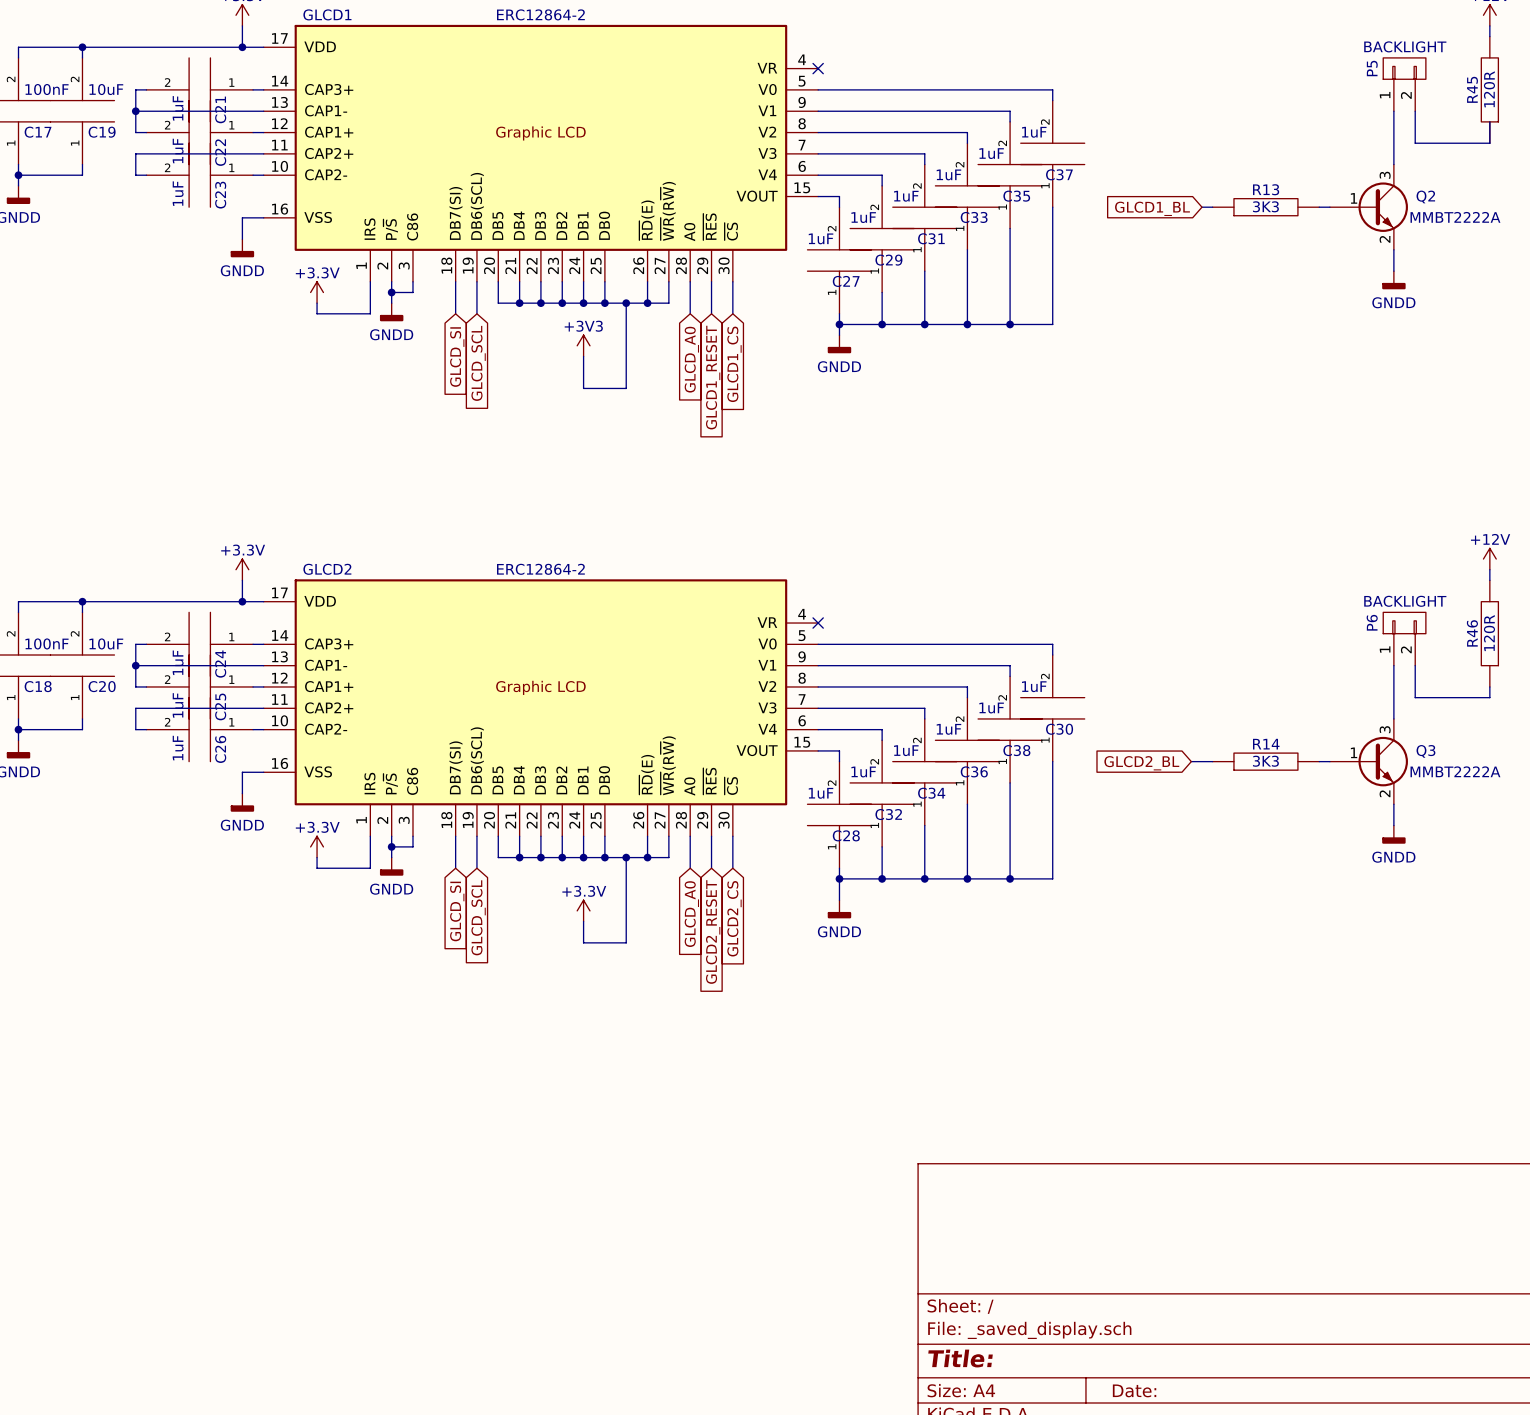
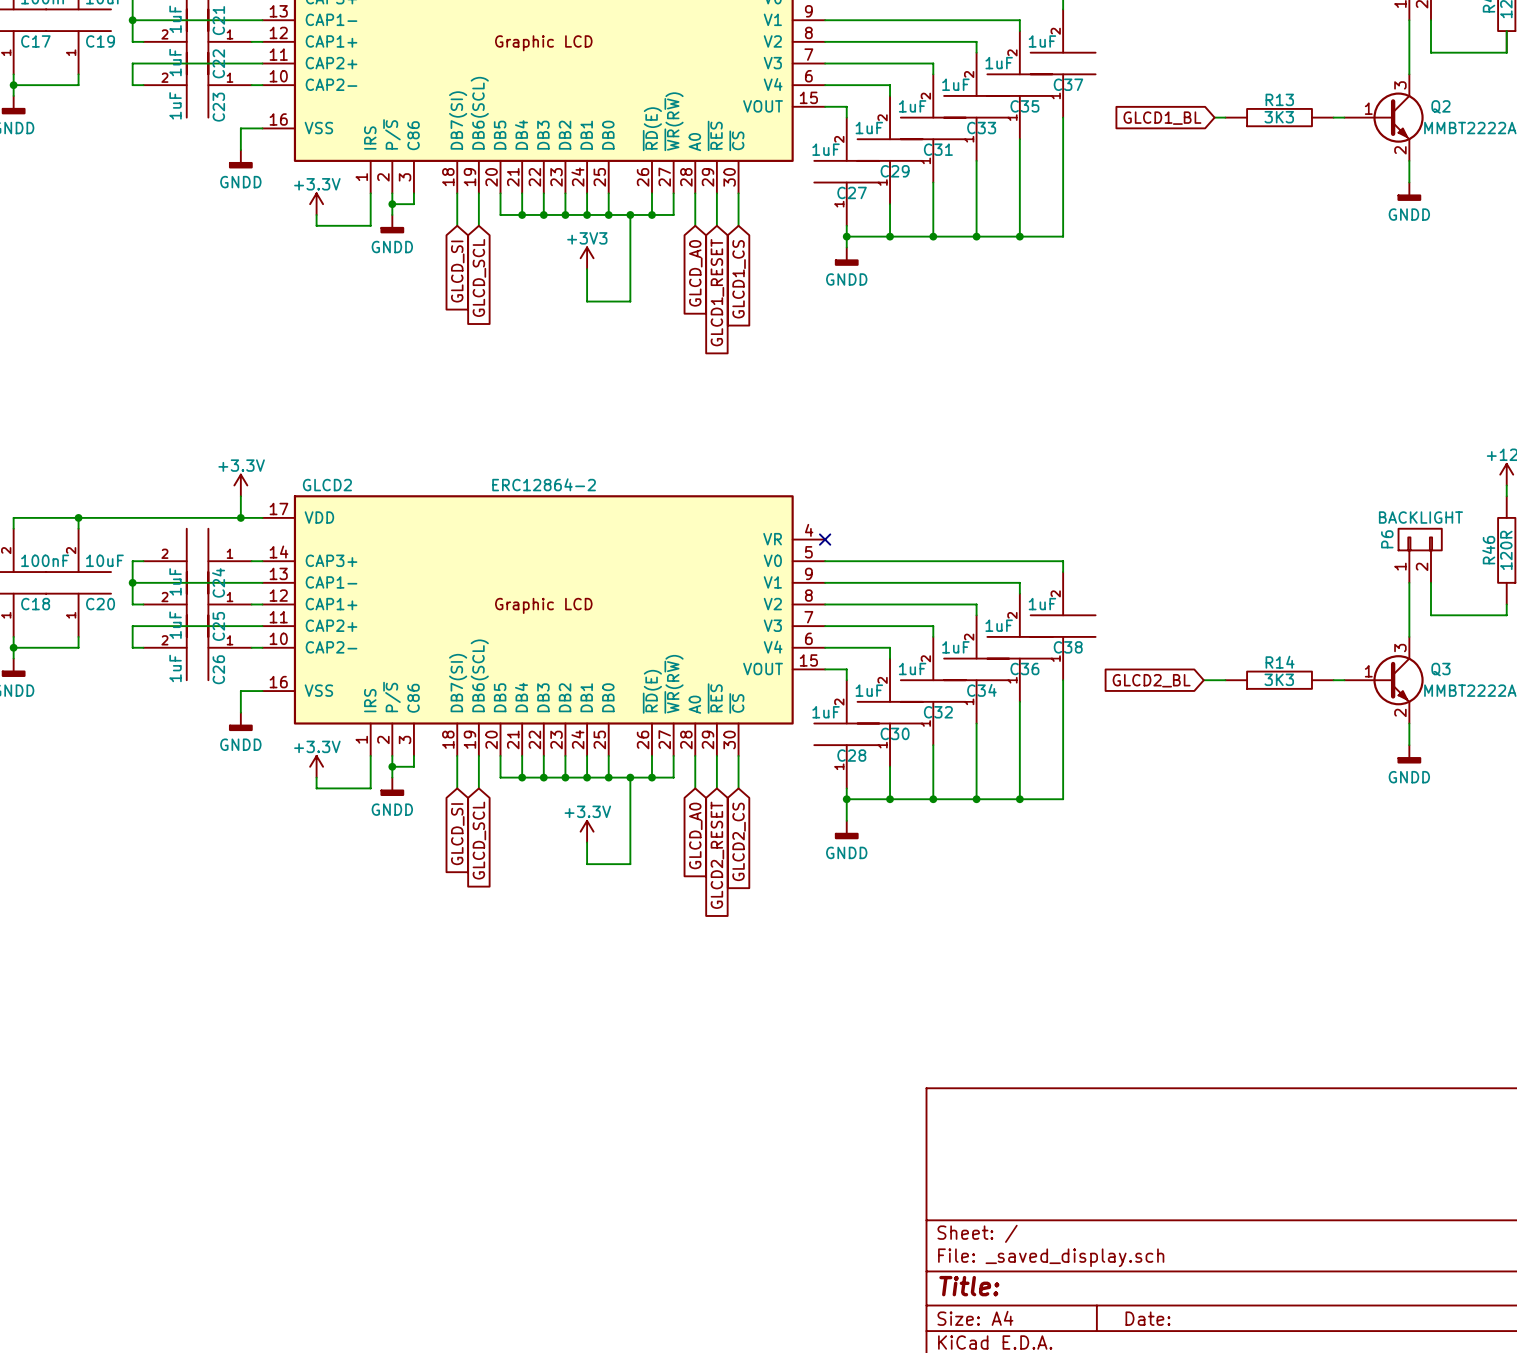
C30 name: C30 (1059, 729) -> C38 (1068, 647)
C38 name: C38 (1016, 750) -> C36 (1024, 668)
C36 name: C36 (974, 771) -> C34 (981, 690)
C34 name: C34 (931, 793) -> C32 (938, 712)
C32 name: C32 (888, 814) -> C30 (895, 733)

